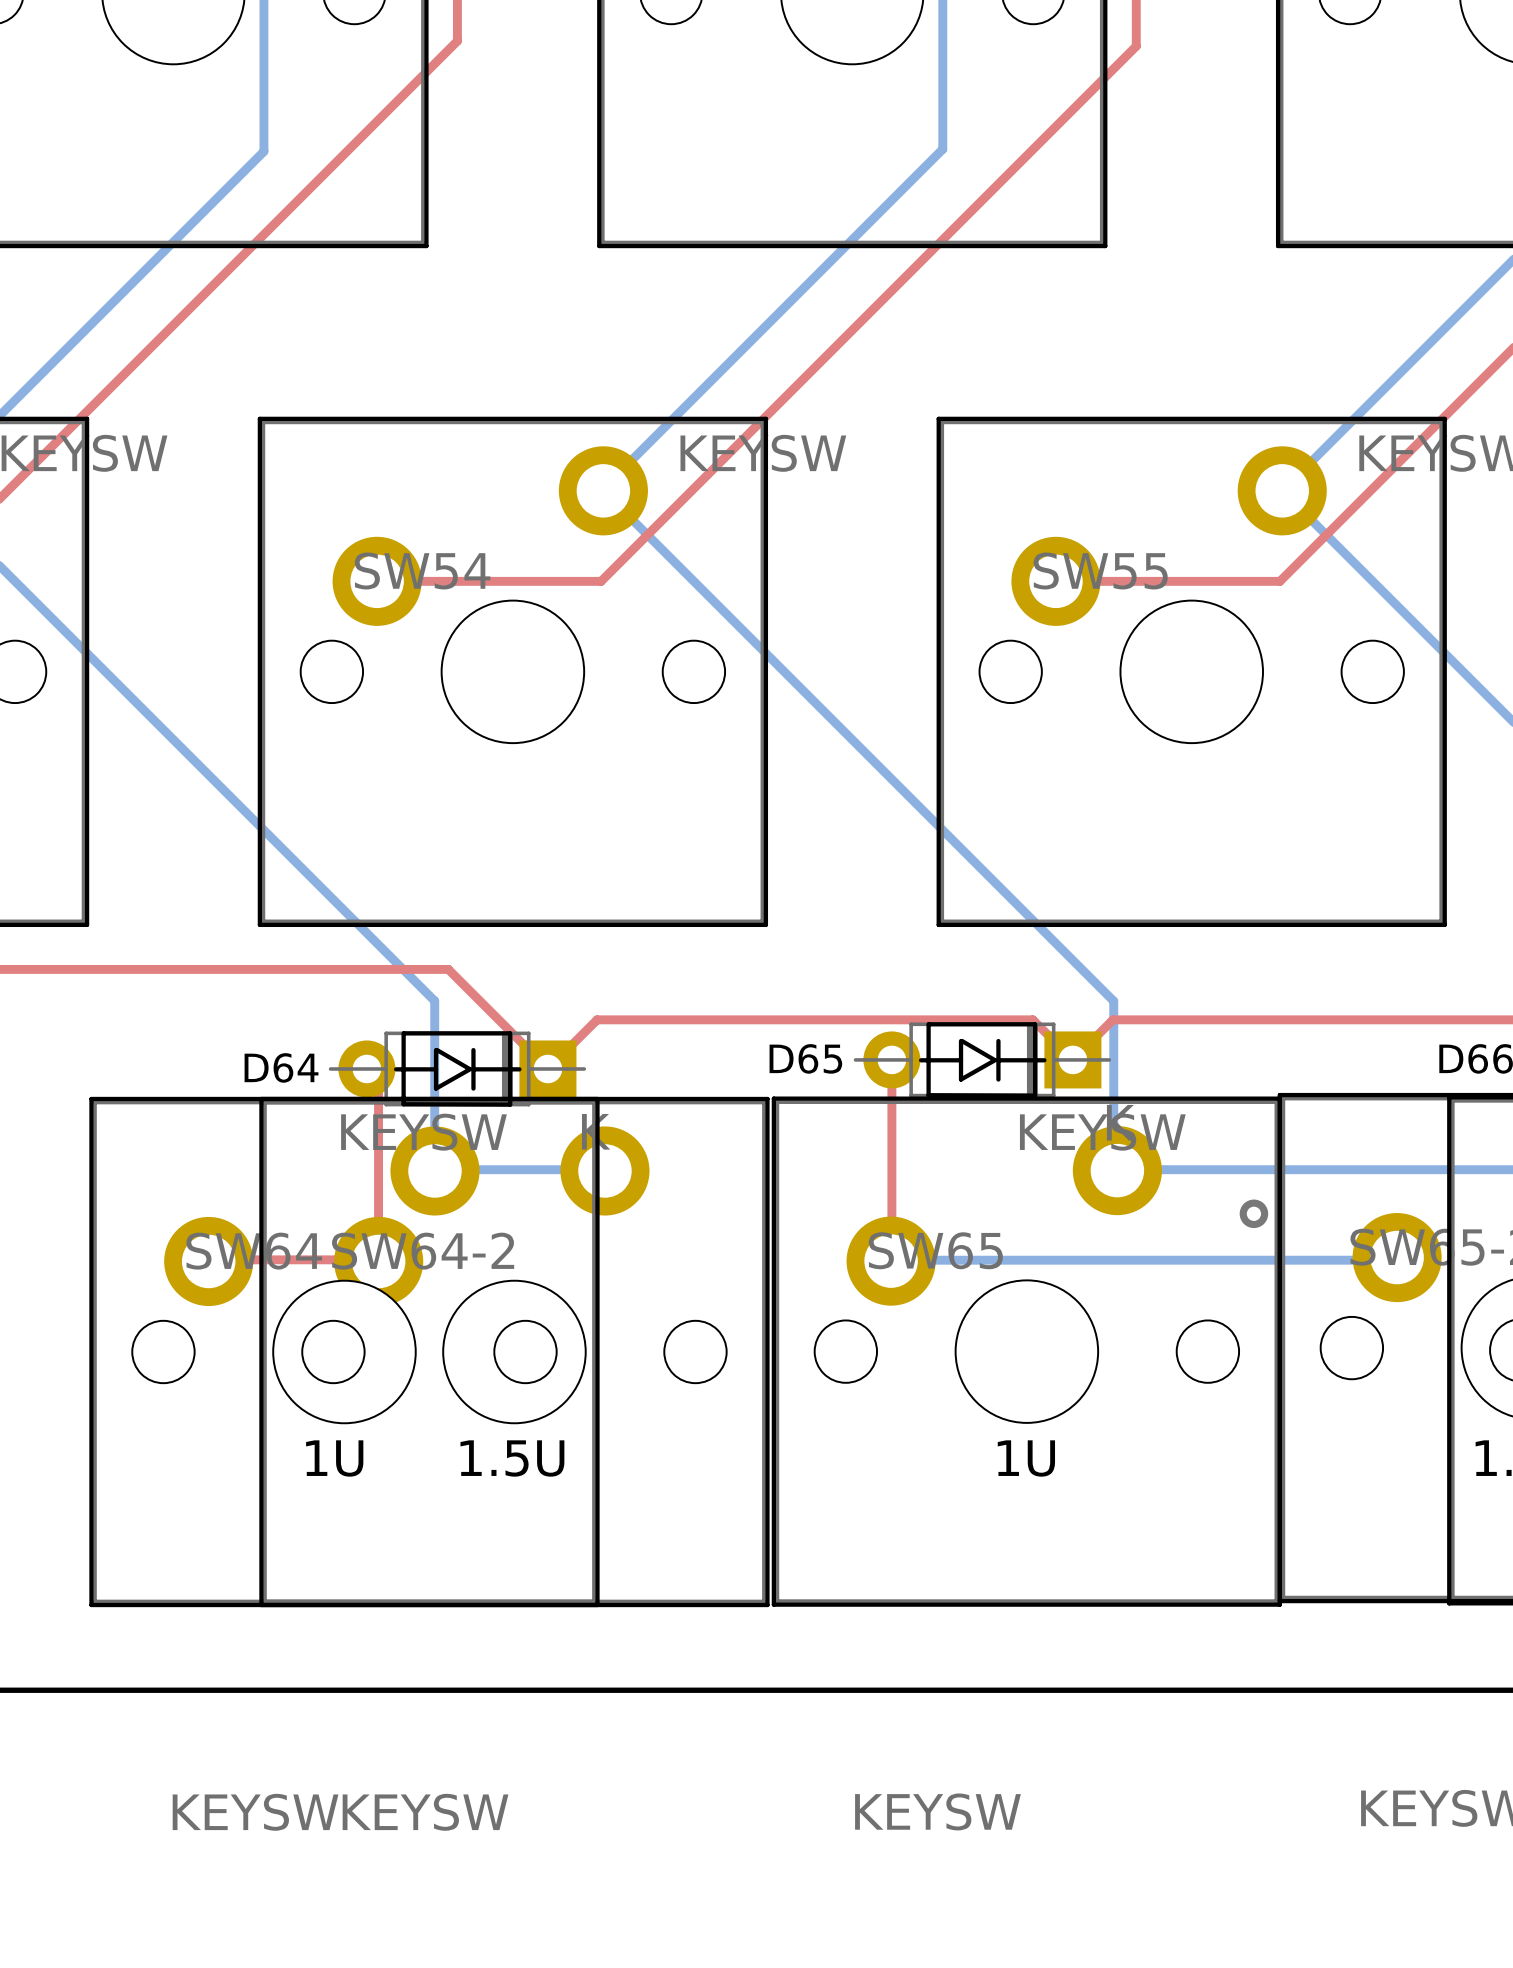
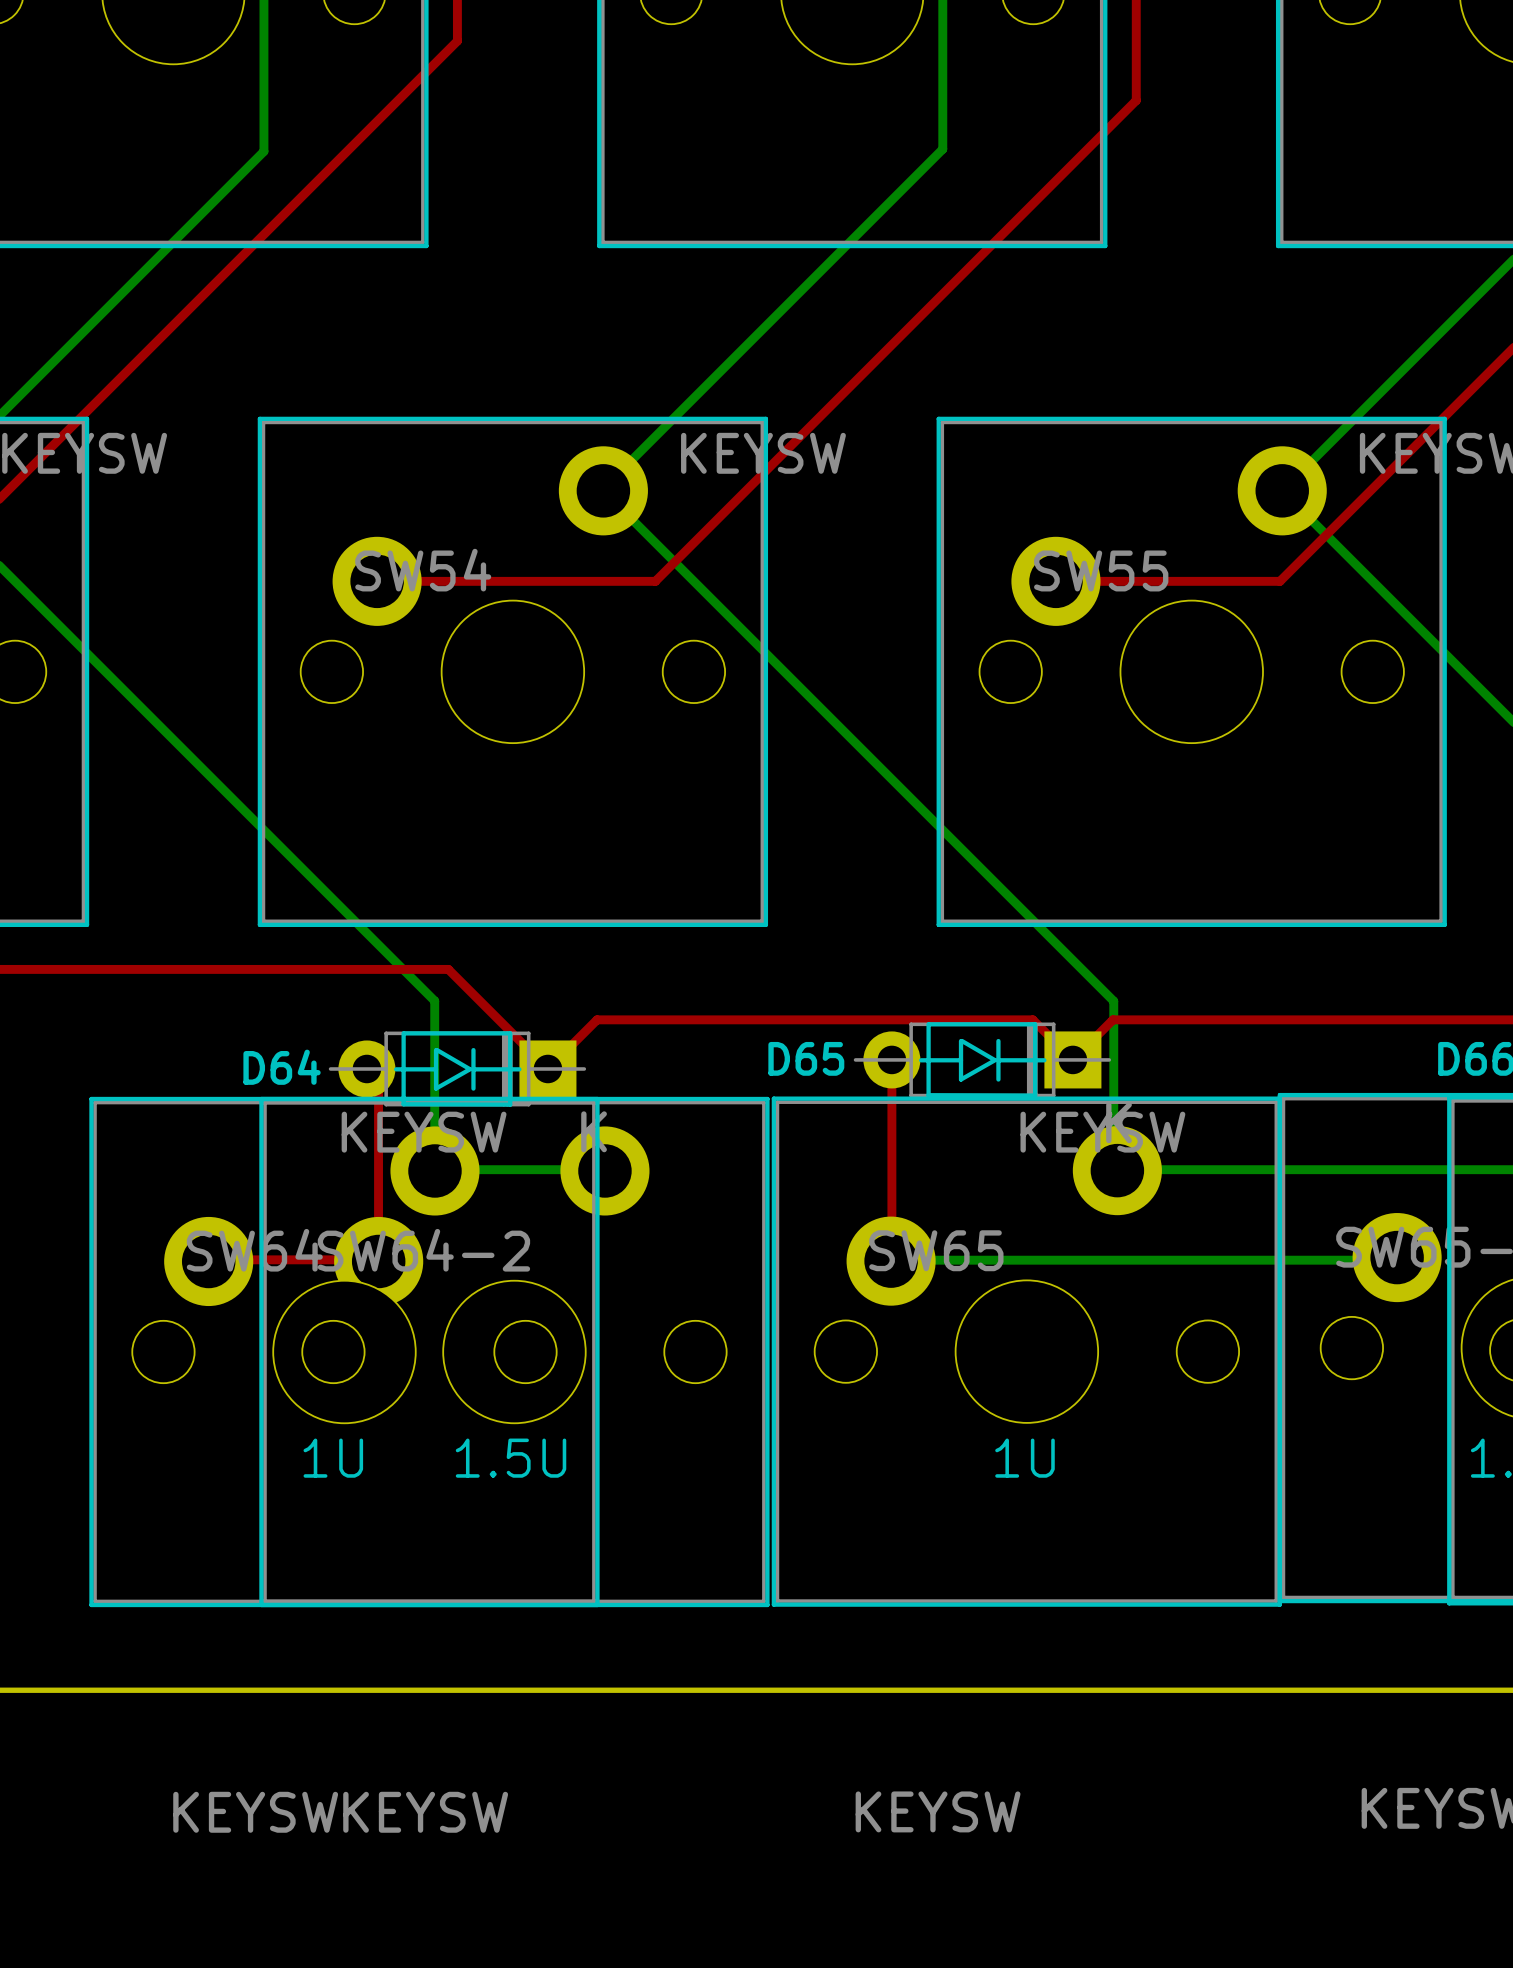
top track: (1136, 46) (601, 581) -> (1136, 46) (1136, 100) (655, 581) (601, 581)
via: (1253, 1213) -> none

